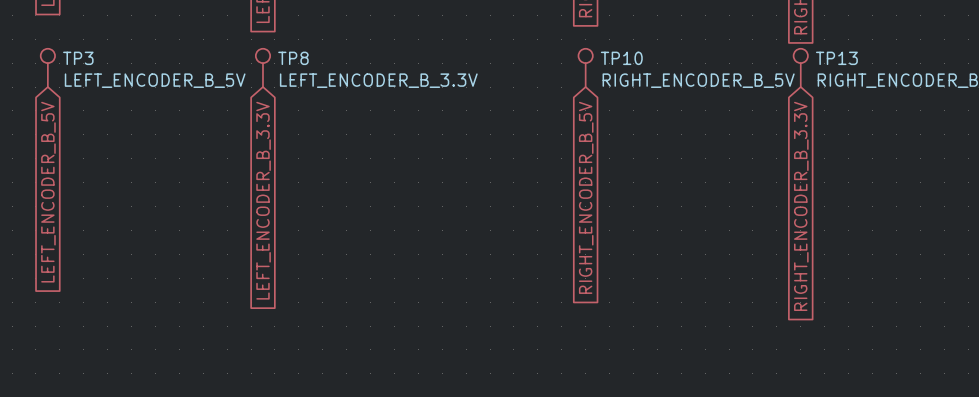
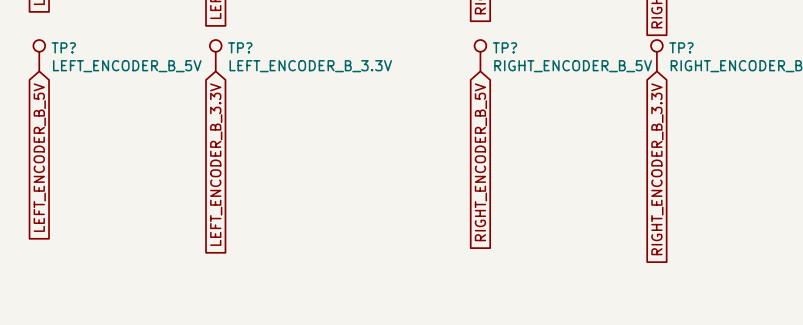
TP3 name: TP3 (78, 58) -> TP? (63, 47)
TP8 name: TP8 (293, 58) -> TP? (240, 47)
TP10 name: TP10 (621, 58) -> TP? (504, 47)
TP13 name: TP13 (836, 58) -> TP? (681, 47)

